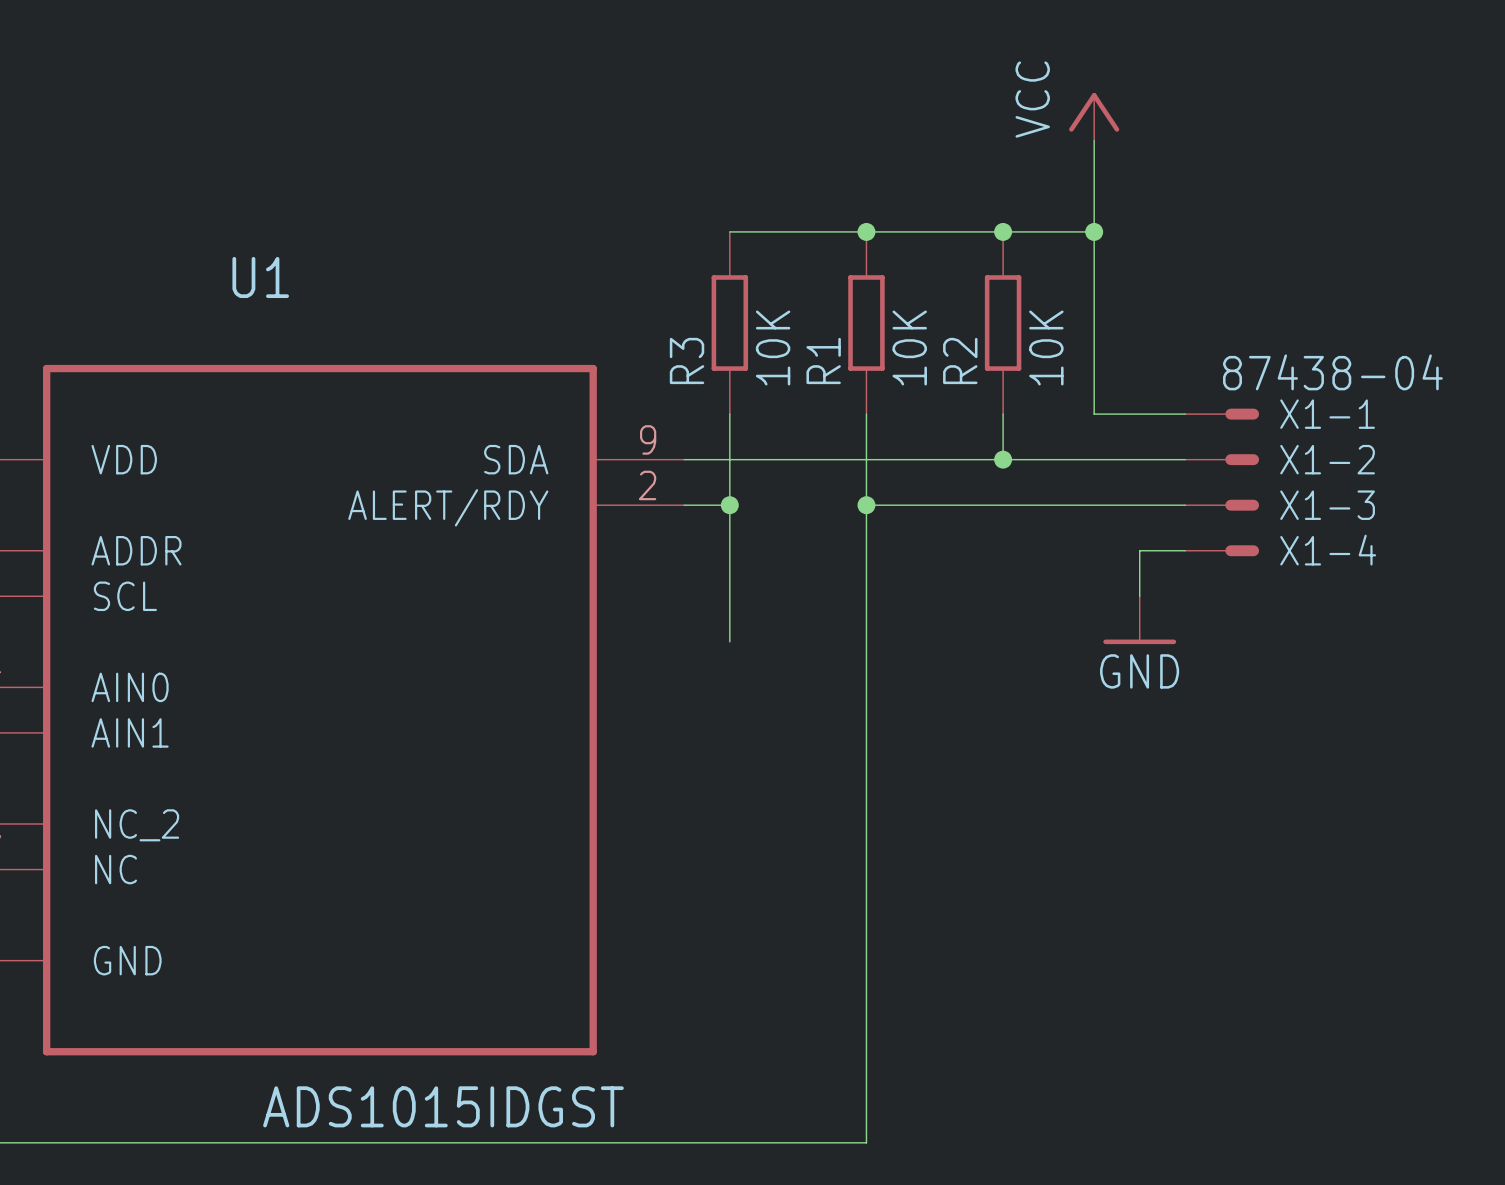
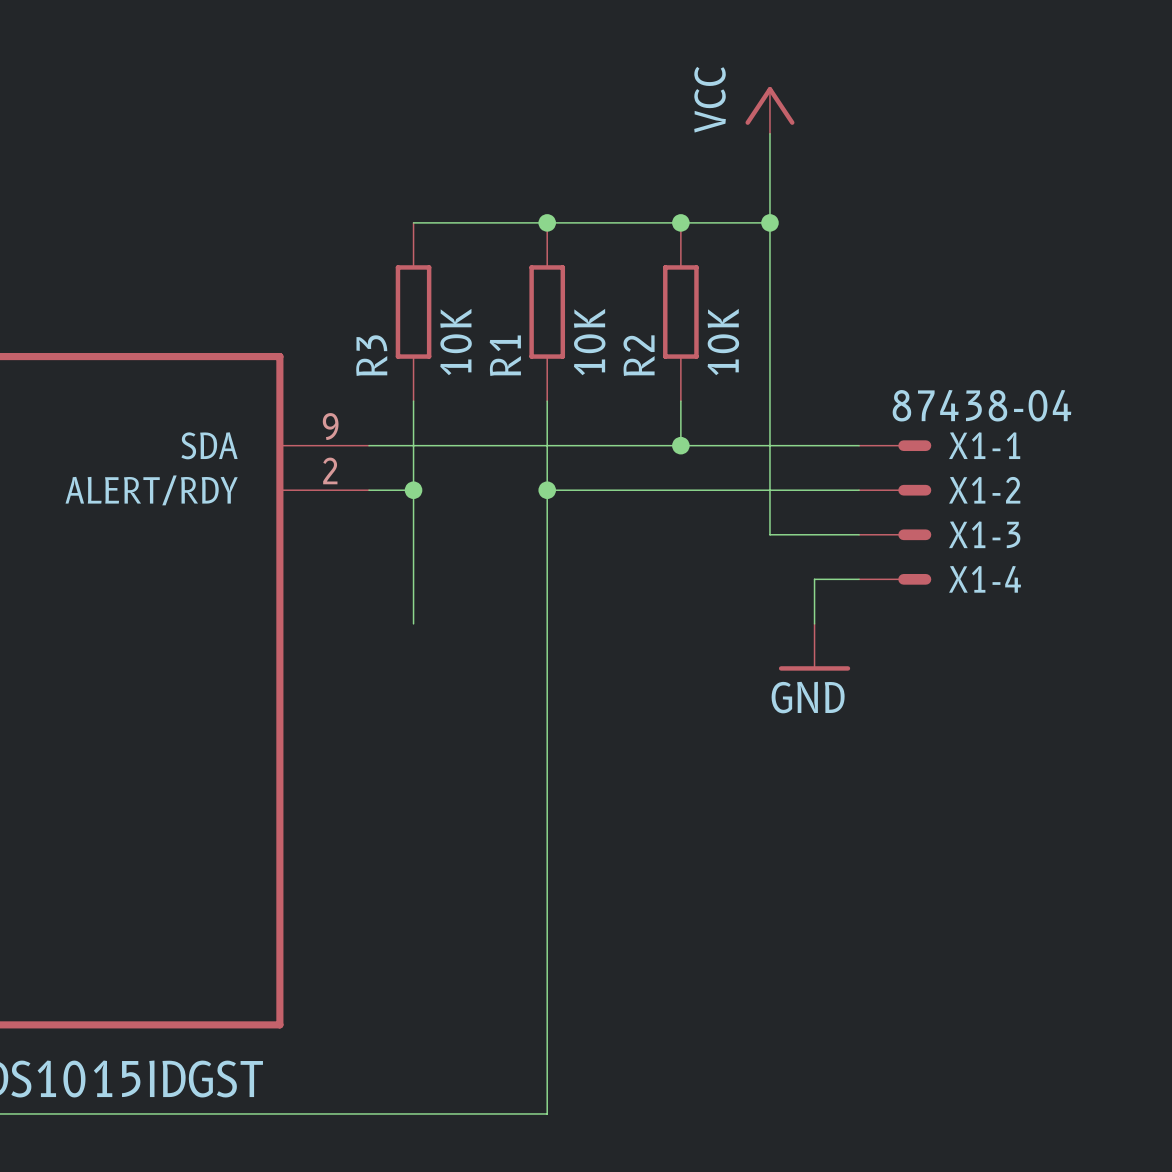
wire: (1094, 414) (1185, 414) -> (769, 401) (769, 534) (814, 534)
X1-1: 87438-04 (1222, 414) -> none
X1-2 value: none -> 87438-04 (981, 405)
X1-2 name: X1-2 (1327, 459) -> X1-1 (984, 445)
X1-3 name: X1-3 (1327, 505) -> X1-2 (984, 490)
wire: (1139, 550) (1139, 596) -> none
X1-4 name: X1-4 (1328, 550) -> X1-3 (984, 534)
wire: none -> (859, 579) (814, 579) (814, 623)
X1-4: none -> (895, 579)
power symbol position: GND (1139, 620) -> GND (814, 647)

